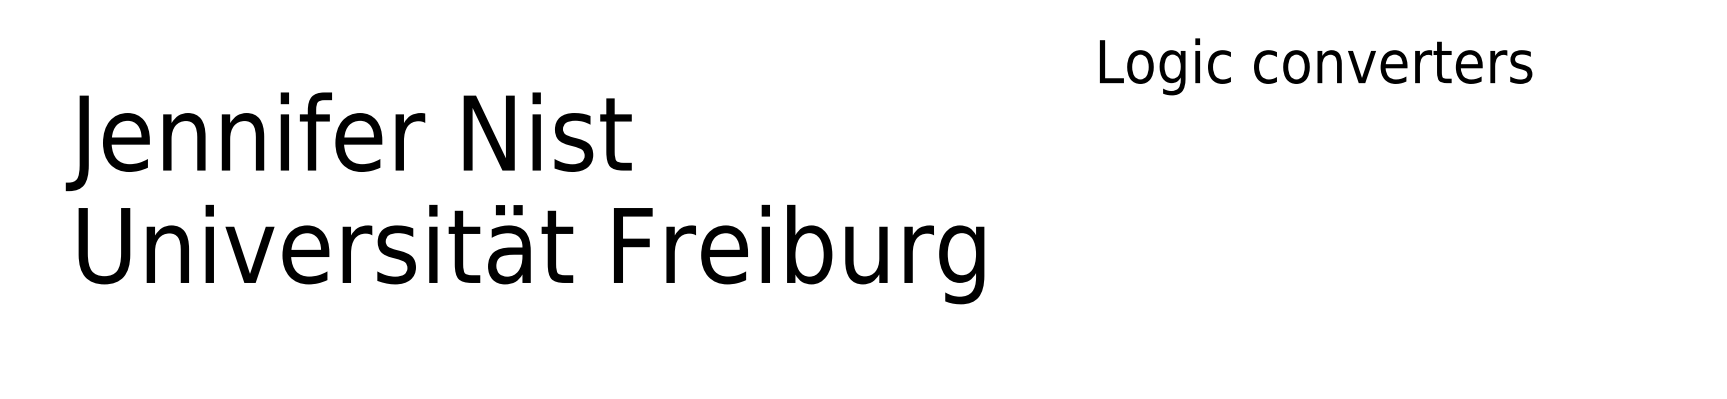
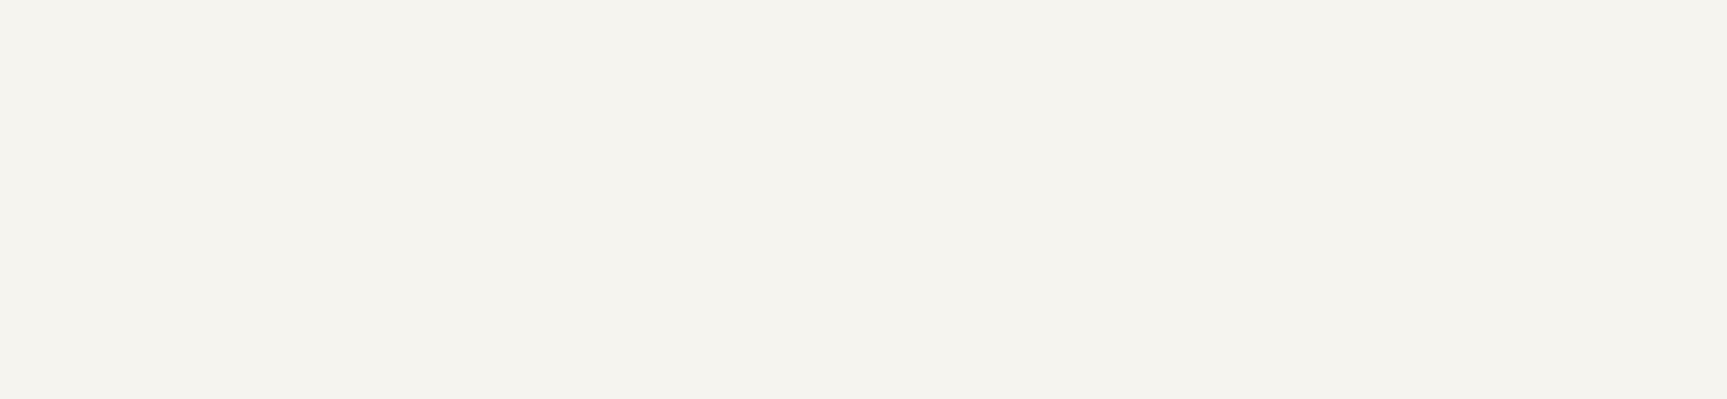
text: Logic converters (1316, 66) -> none
text: Jennifer Nist (348, 141) -> none
text: Universität Freiburg (531, 254) -> none

